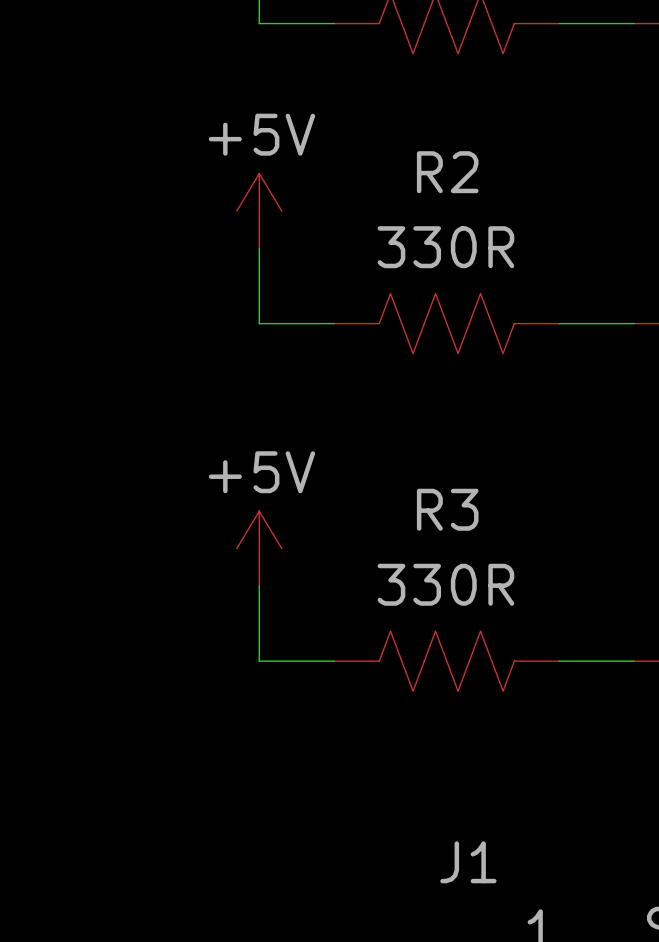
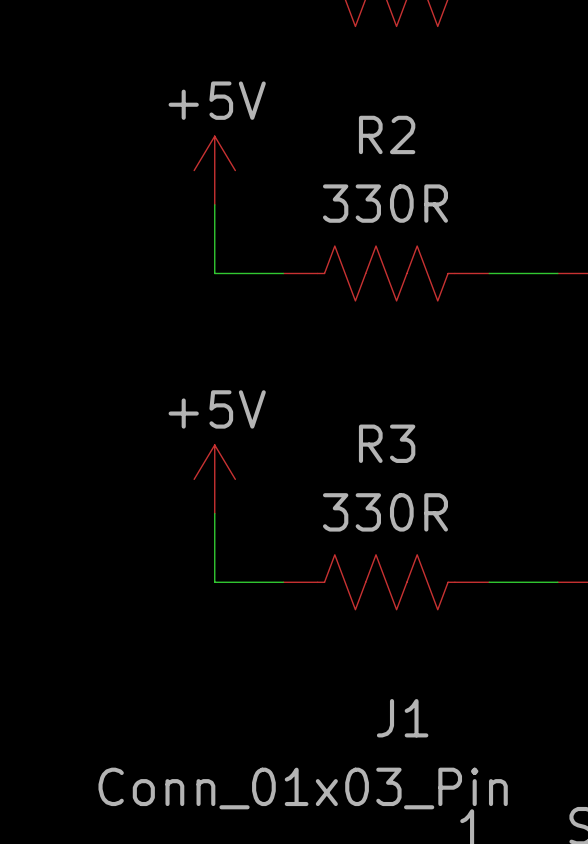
J1 name position: J1 (468, 862) -> J1 (402, 718)
J1 value: none -> Conn_01x03_Pin (303, 788)

